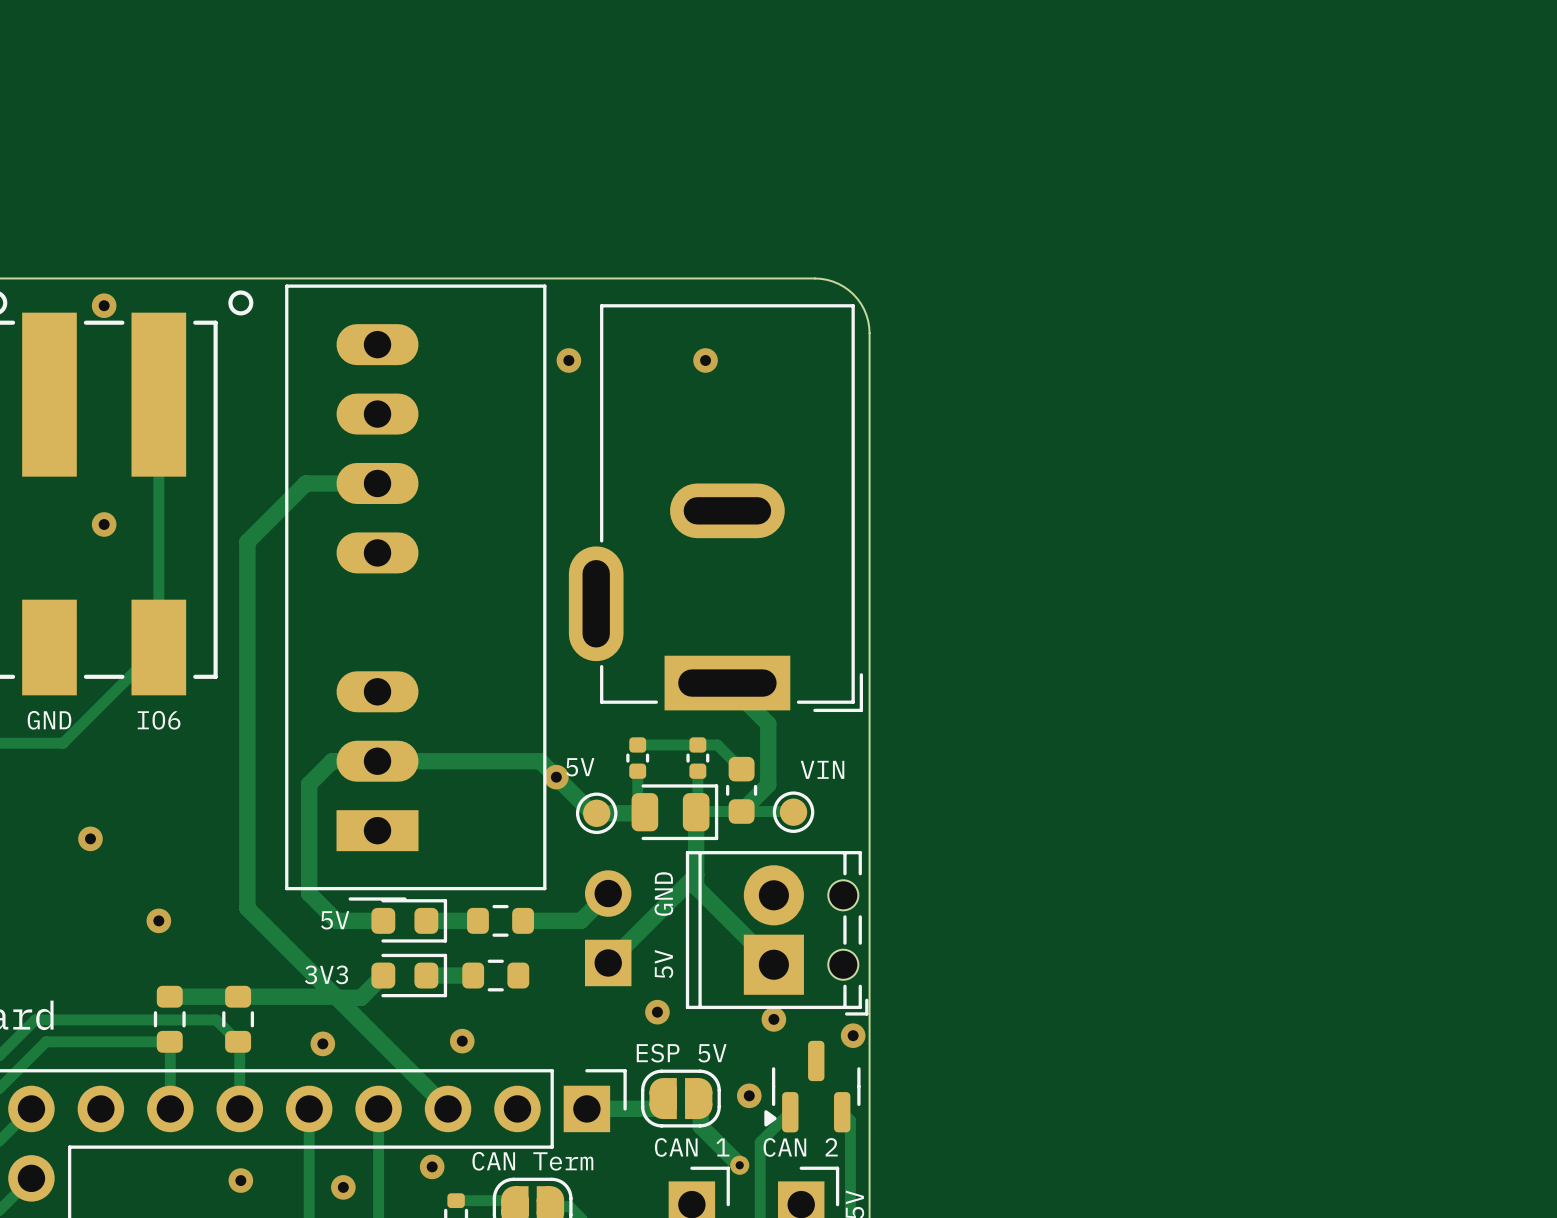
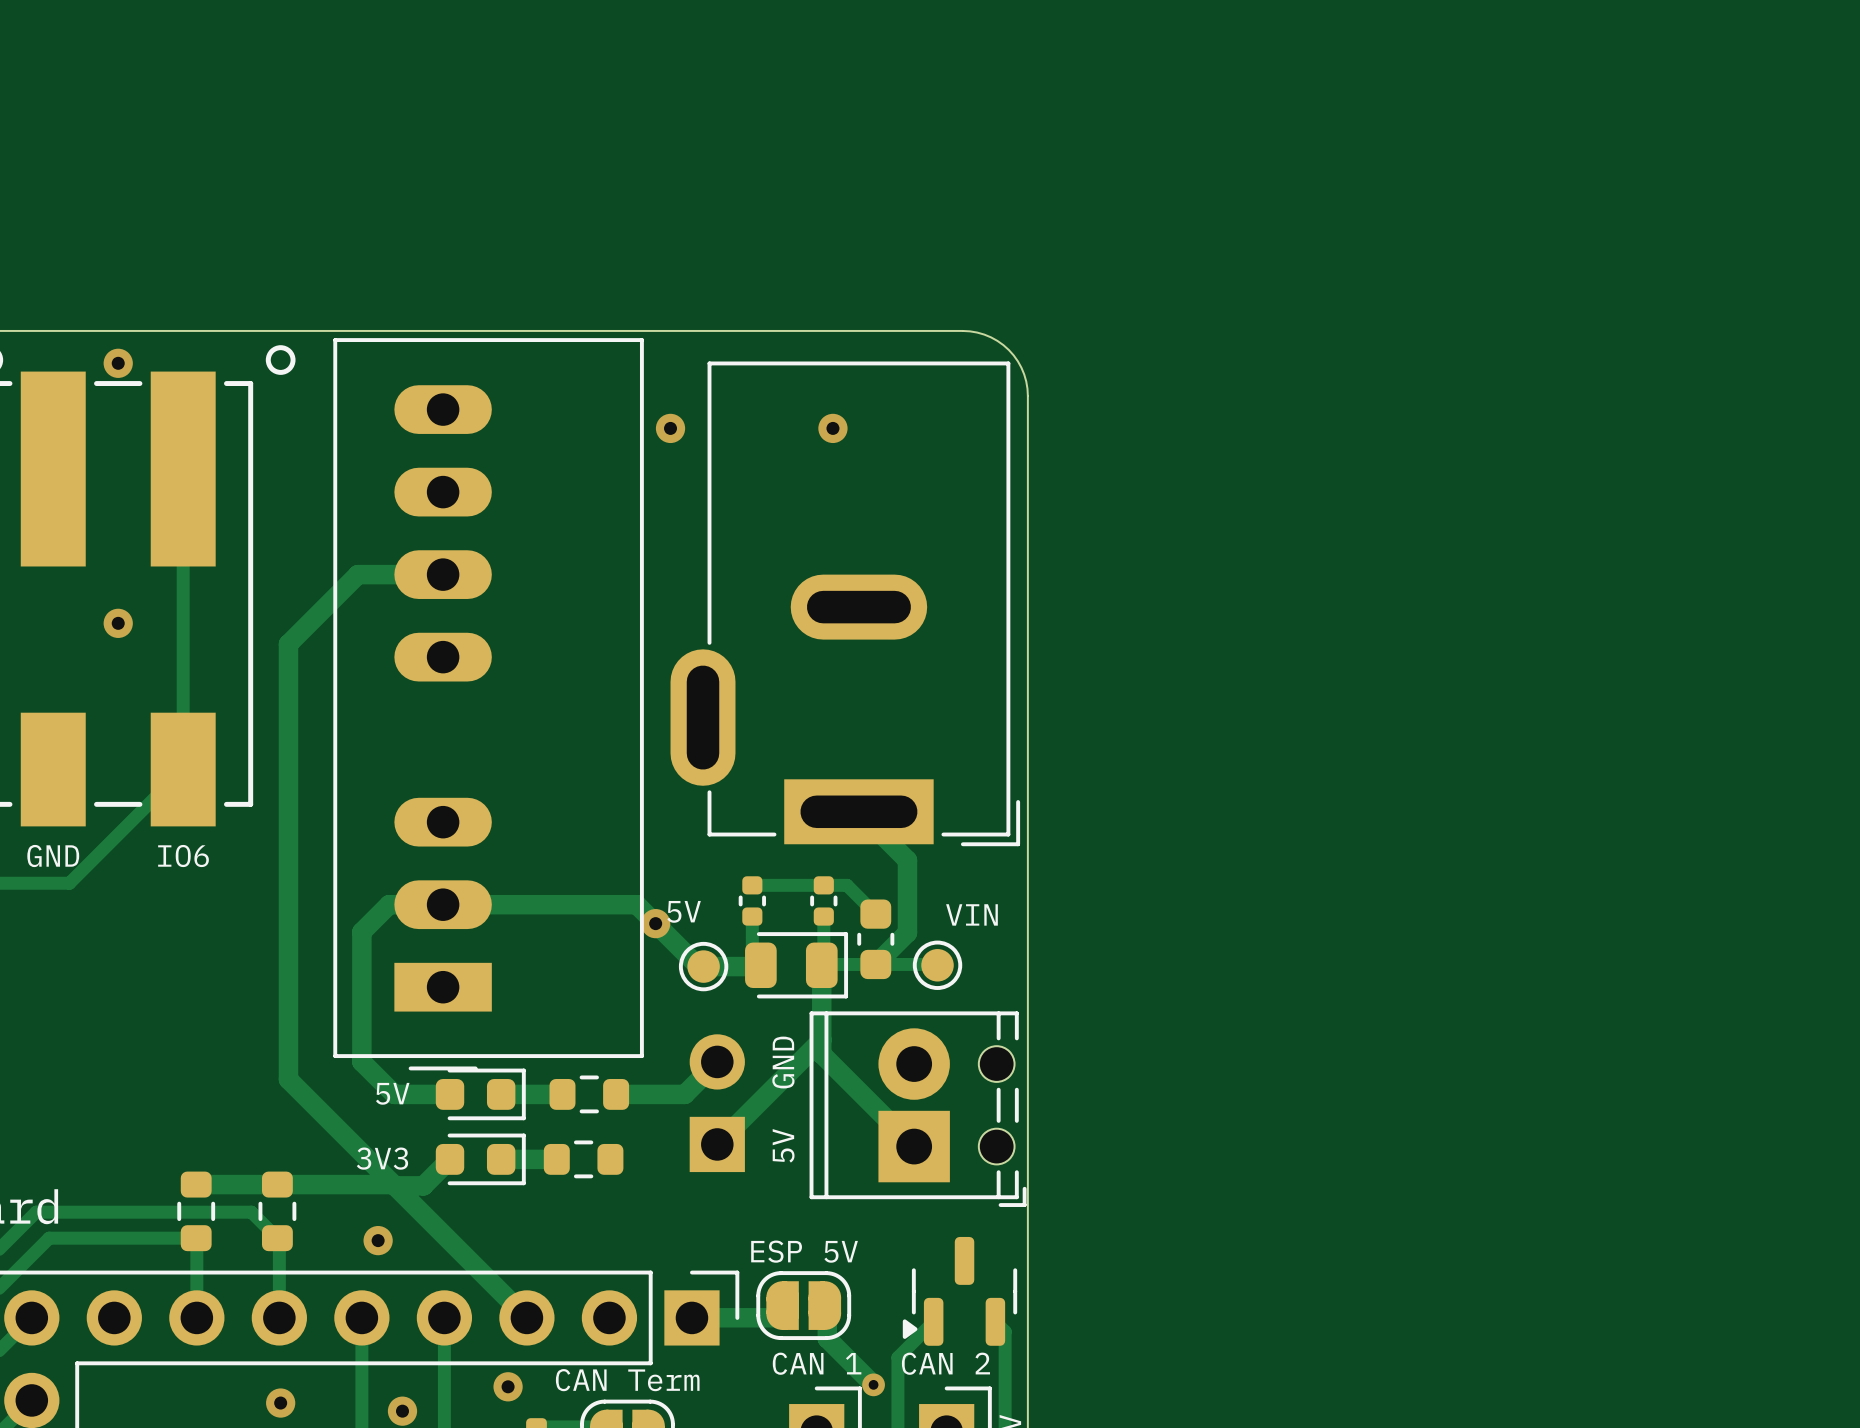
via: (90, 838) -> none
via: (158, 920) -> none
via: (657, 1012) -> none
via: (773, 1019) -> none
via: (853, 1035) -> none
via: (462, 1041) -> none
via: (749, 1095) -> none

